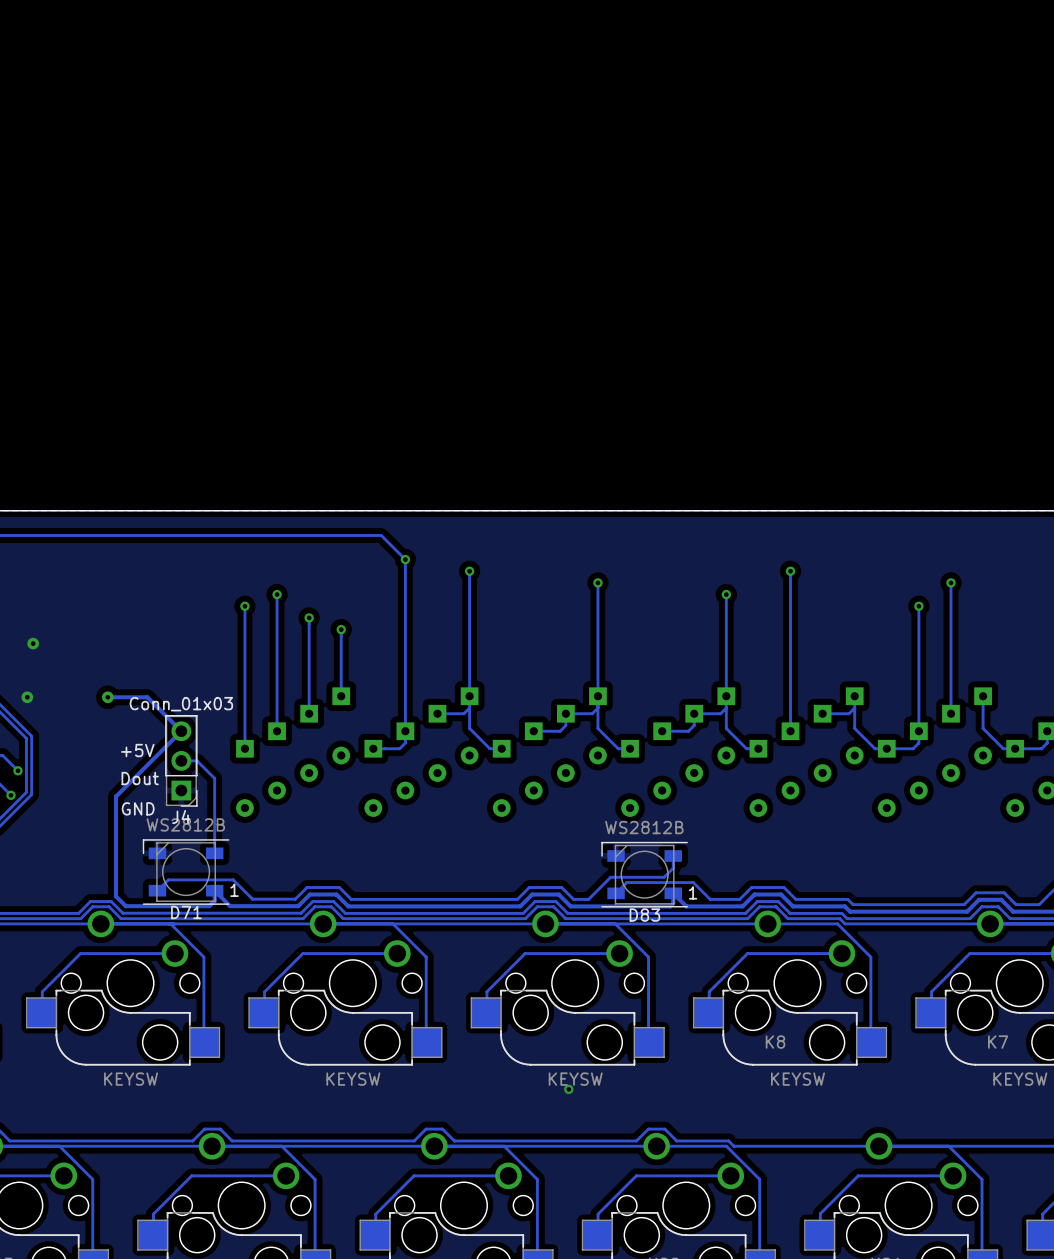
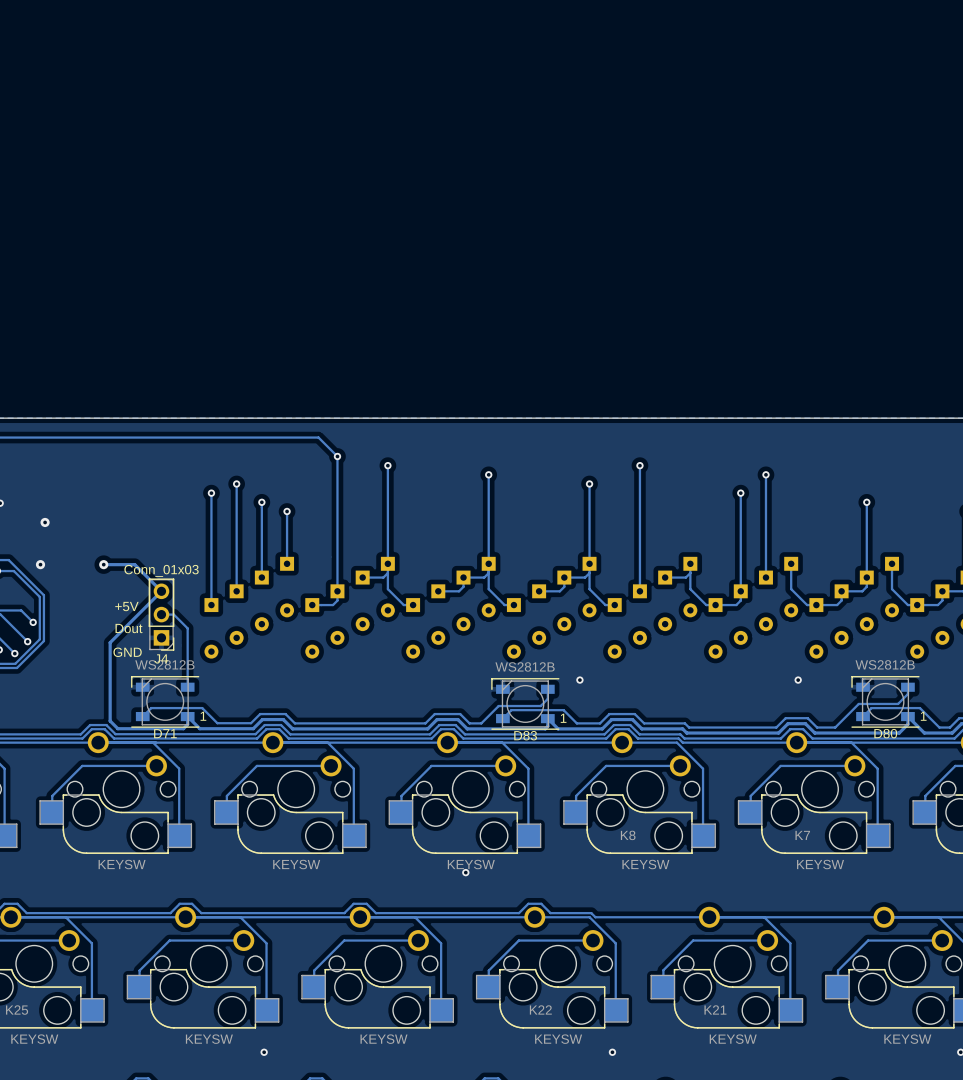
via: none -> (579, 680)
via: none -> (798, 680)

